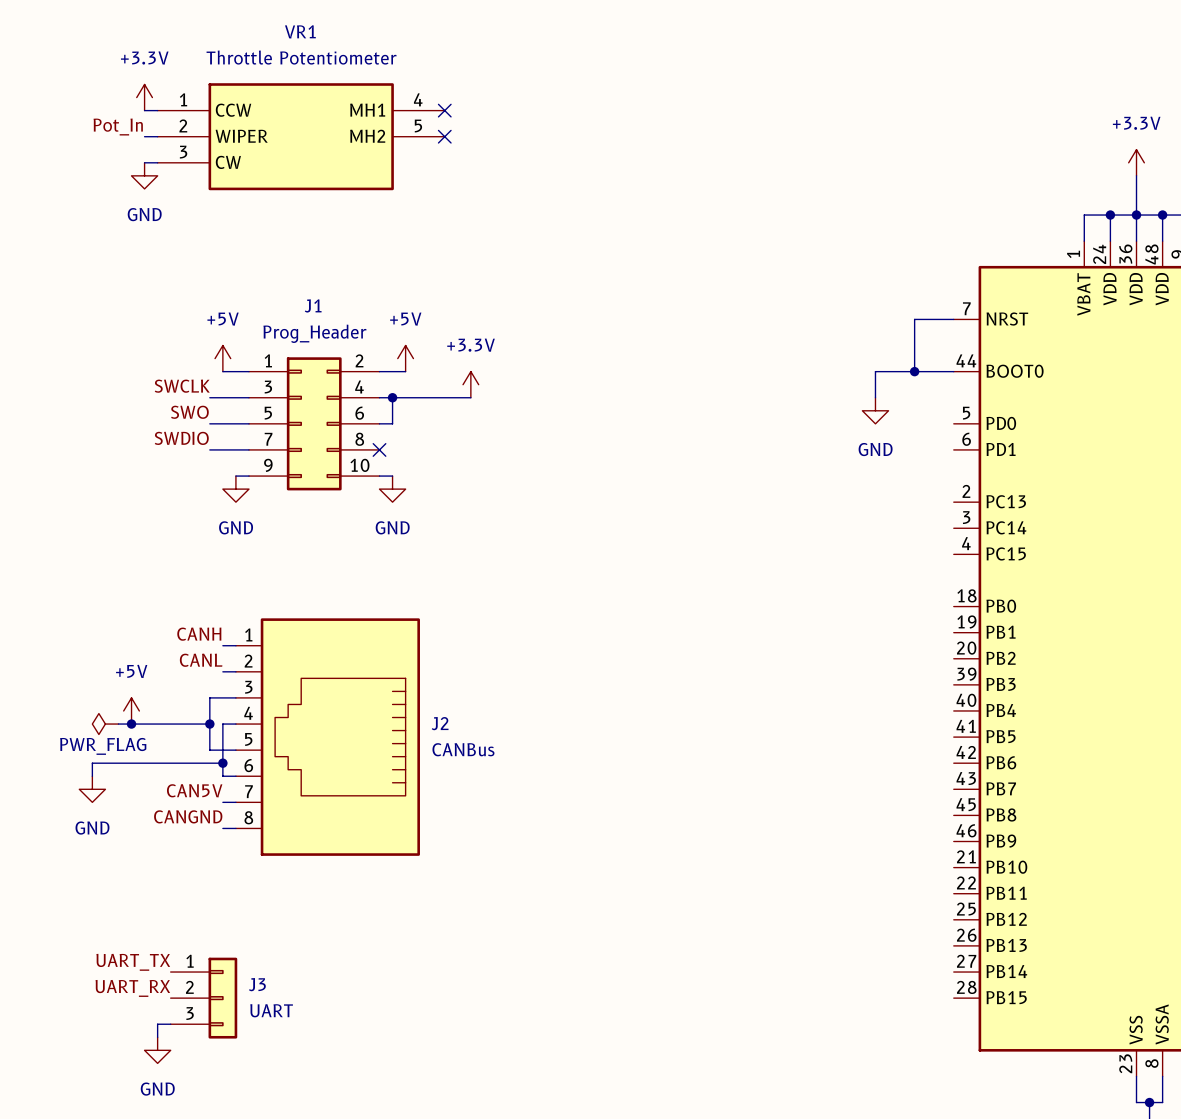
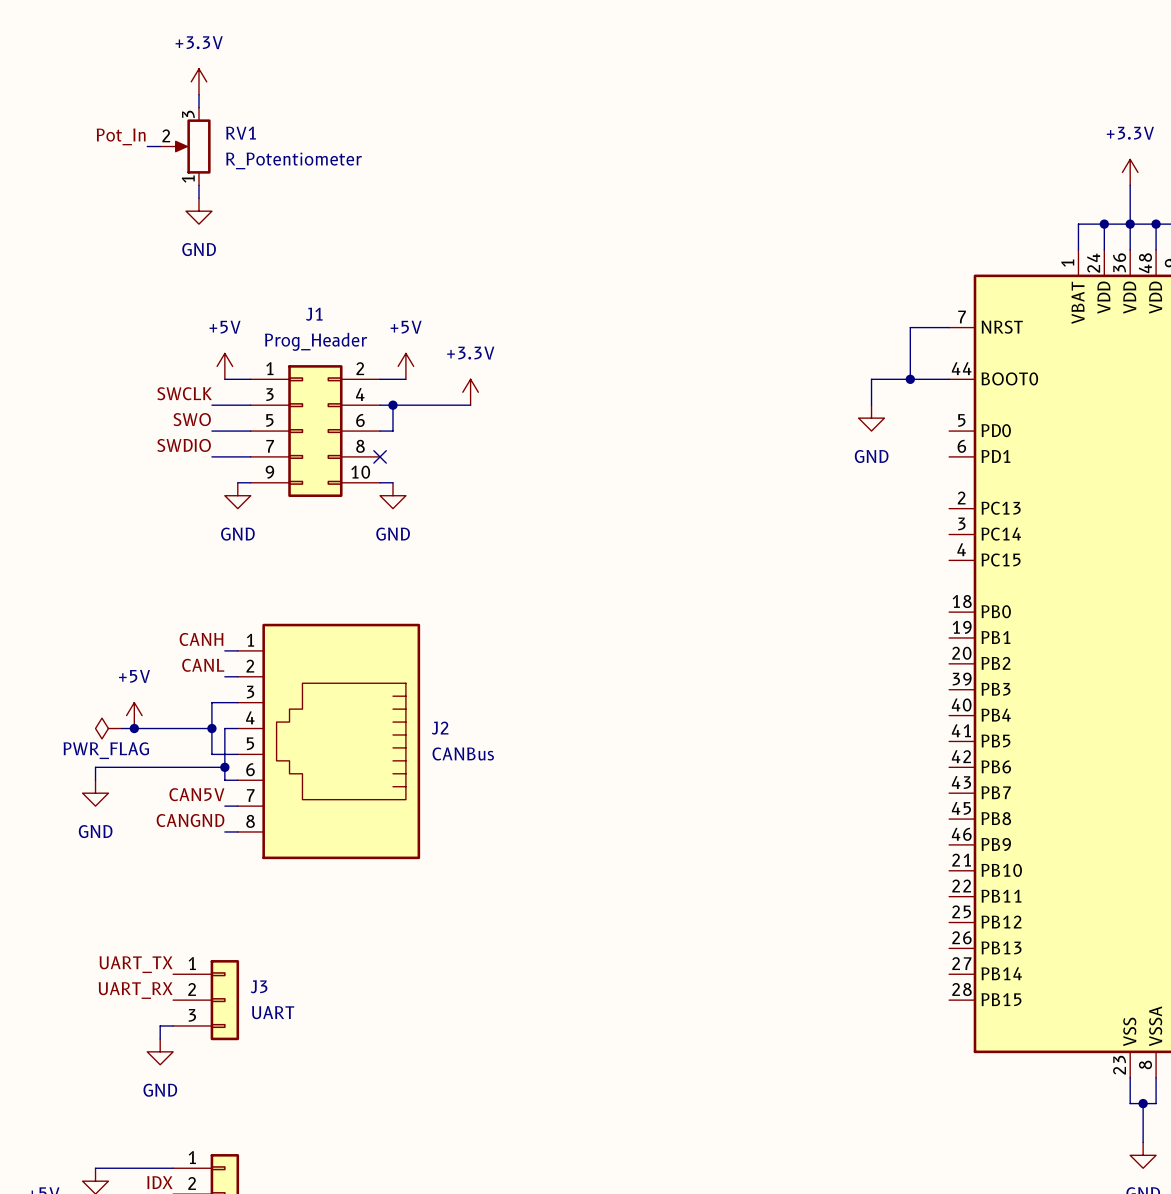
wire: none -> (198, 94) (198, 107)
power symbol position: +3.3V (144, 97) -> +3.3V (198, 81)
wire: (144, 110) (157, 110) -> none
no-connect mark: (444, 110) -> none
RV1: none -> R_Potentiometer (185, 146)
VR1: Throttle Potentiometer (301, 136) -> none
no-connect mark: (444, 136) -> none
wire: (144, 162) (157, 162) -> none
power symbol position: GND (144, 175) -> GND (198, 211)
wire: none -> (198, 185) (198, 198)

